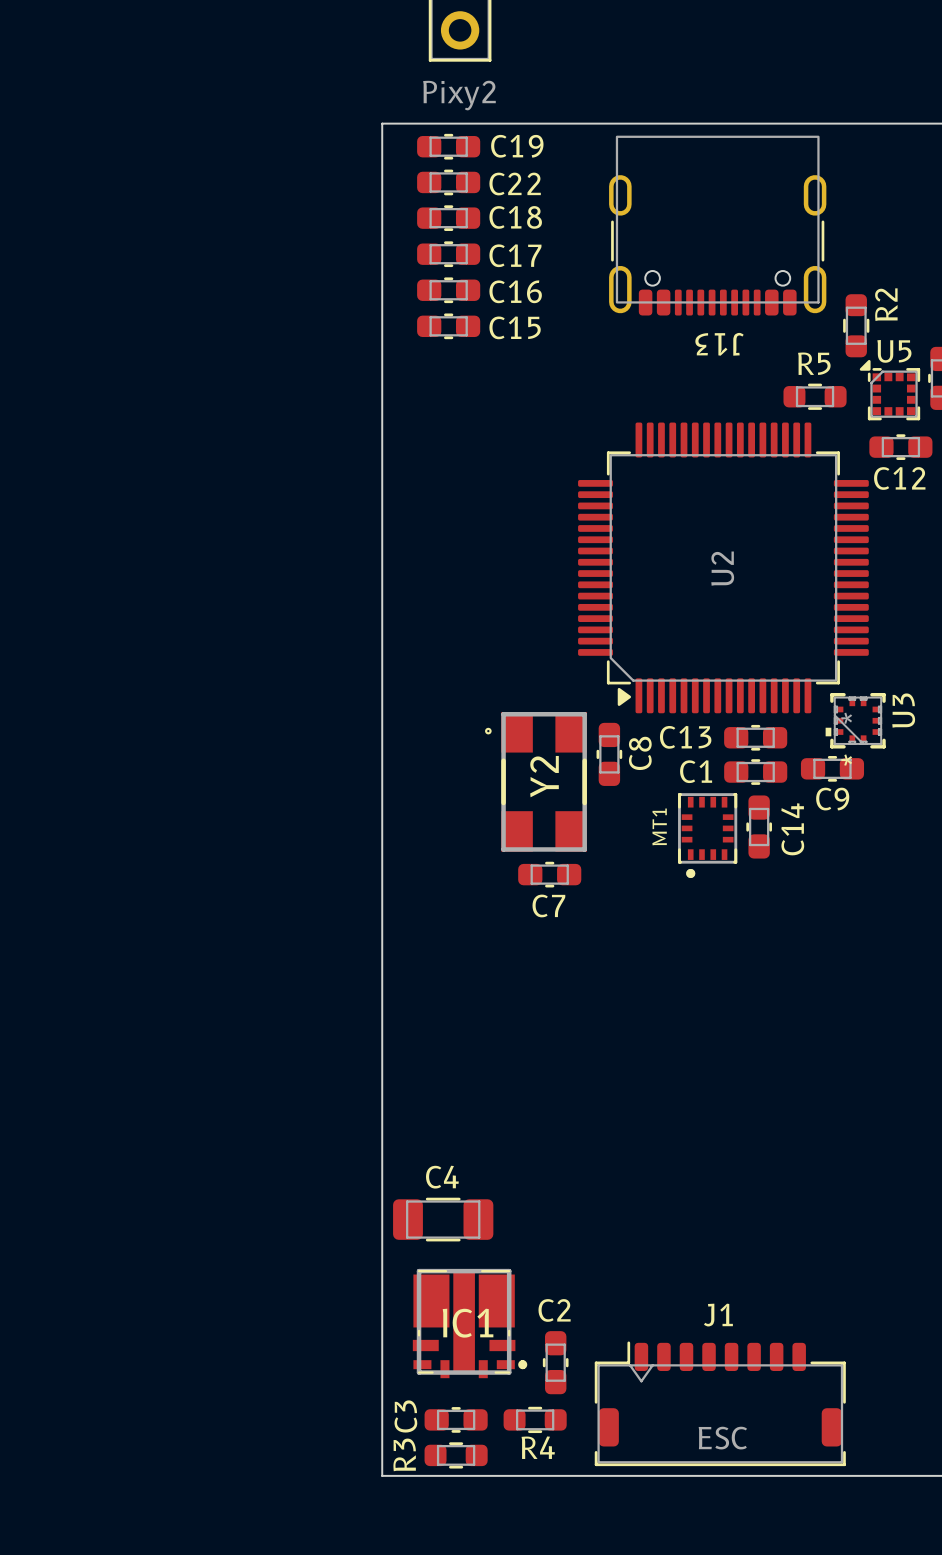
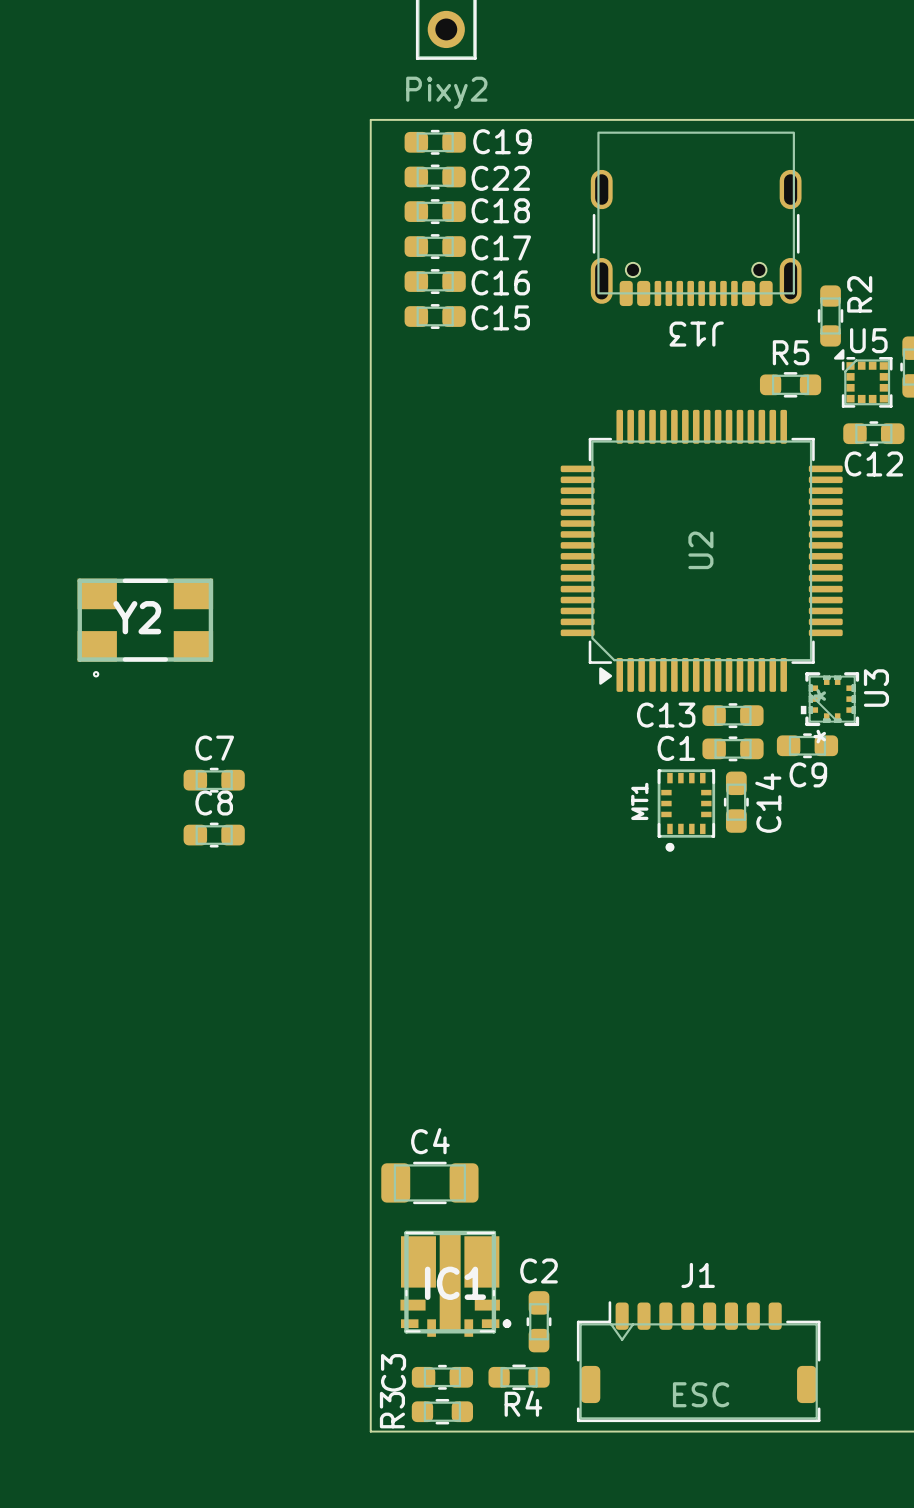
C8 rotation: 0° (609, 754) -> 90° clockwise (214, 835)
C8 position: (609, 754) -> (214, 835)
Y2 rotation: 0° (535, 781) -> 90° counterclockwise (145, 628)
Y2 position: (535, 781) -> (145, 628)
C7 position: (549, 874) -> (214, 780)
C7 name position: C7 (548, 905) -> C7 (214, 748)

